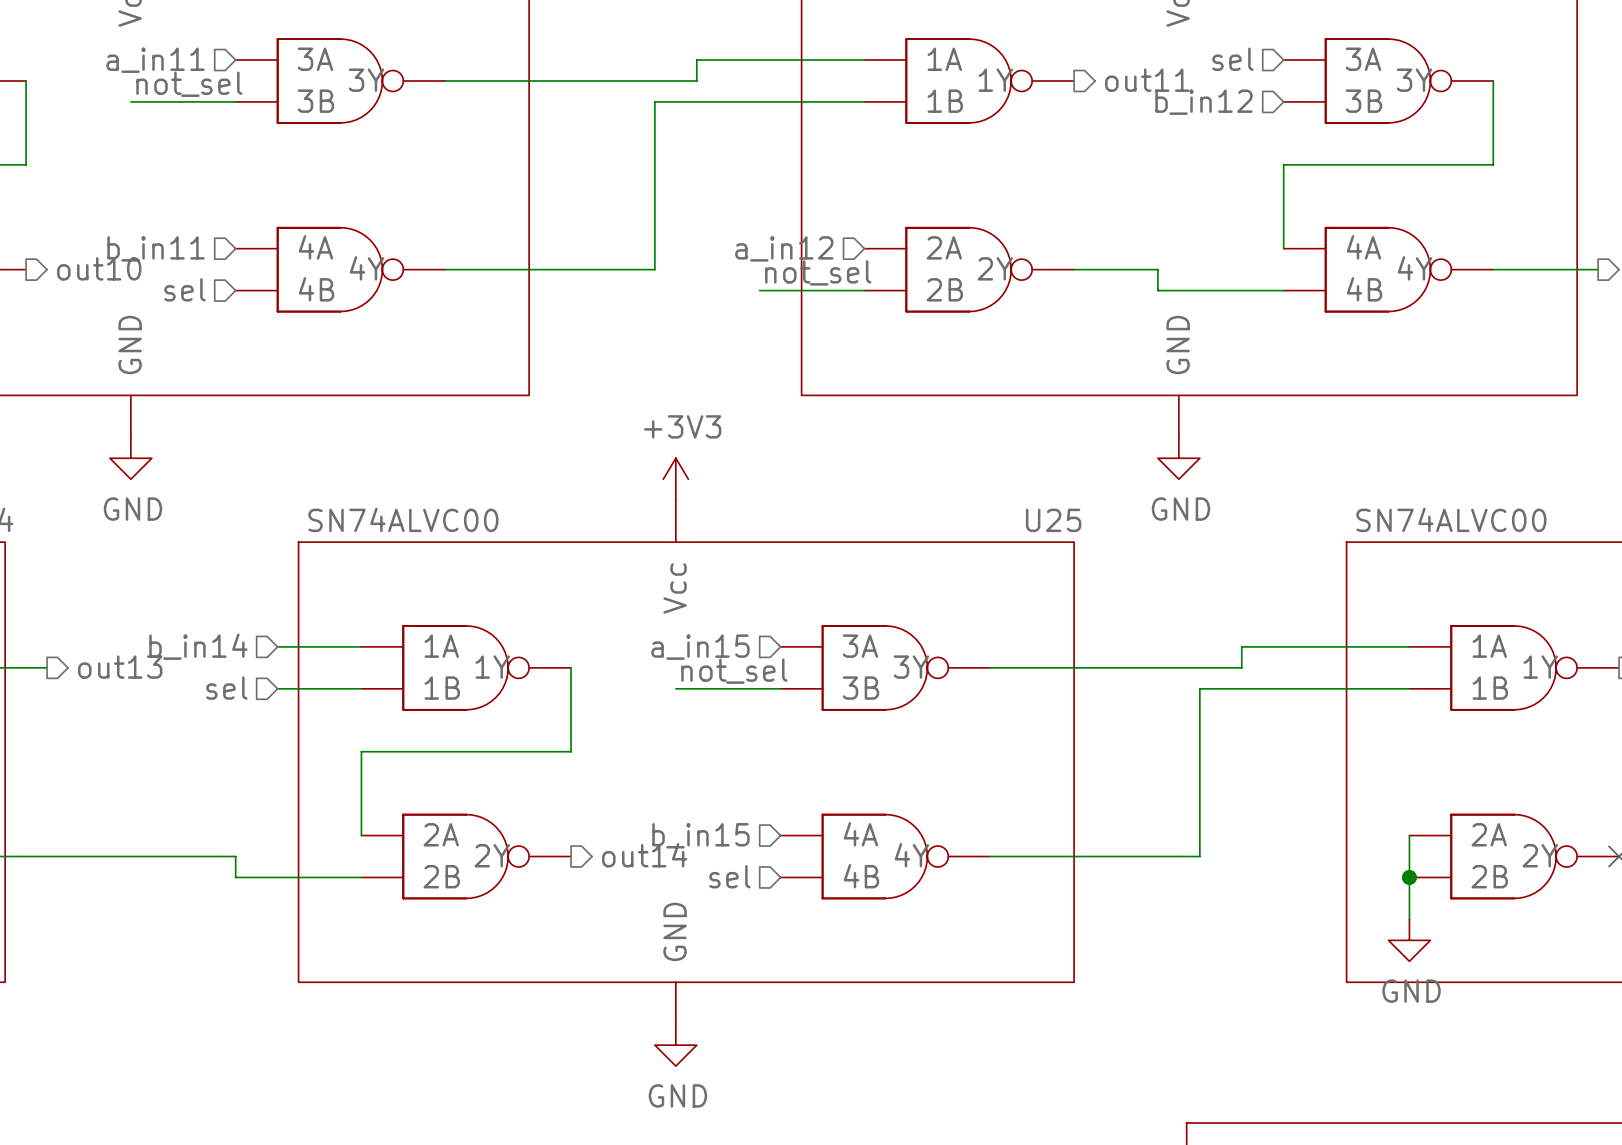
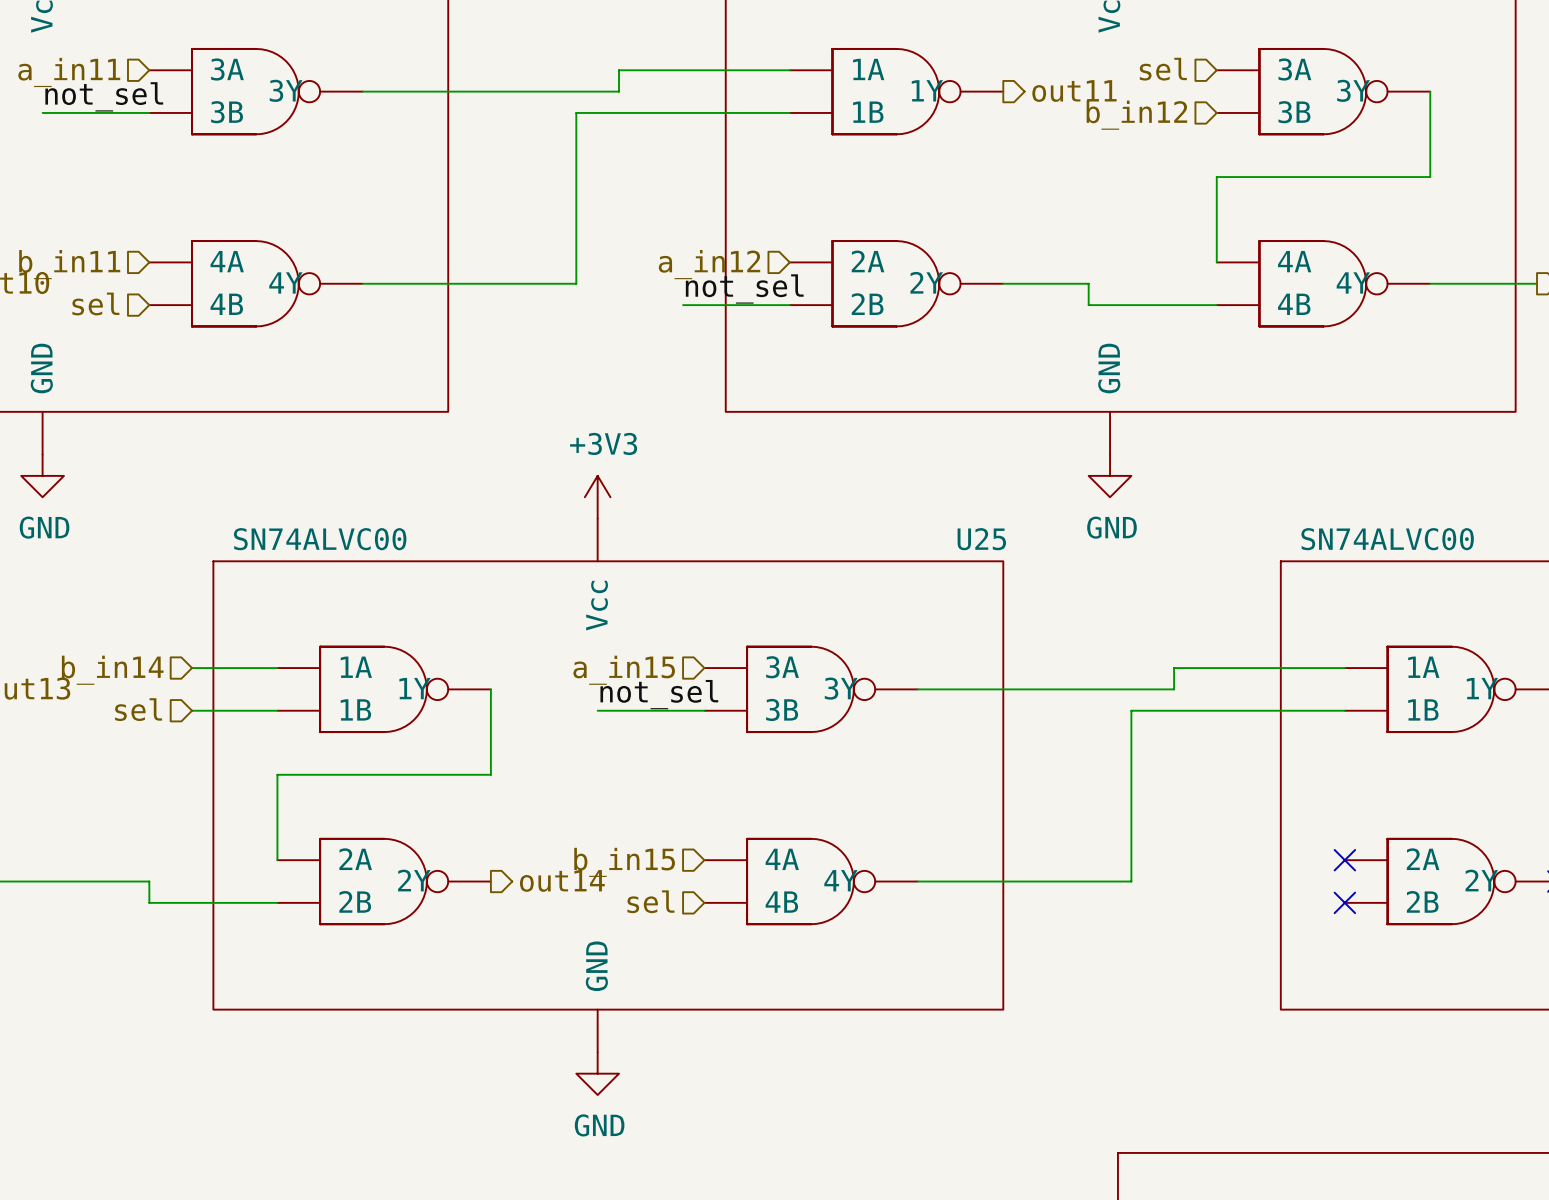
wire: (1409, 835) (1409, 919) -> none
no-connect mark: none -> (1344, 860)
junction: (1409, 877) -> none
no-connect mark: none -> (1344, 902)
power symbol: GND (1409, 940) -> none

